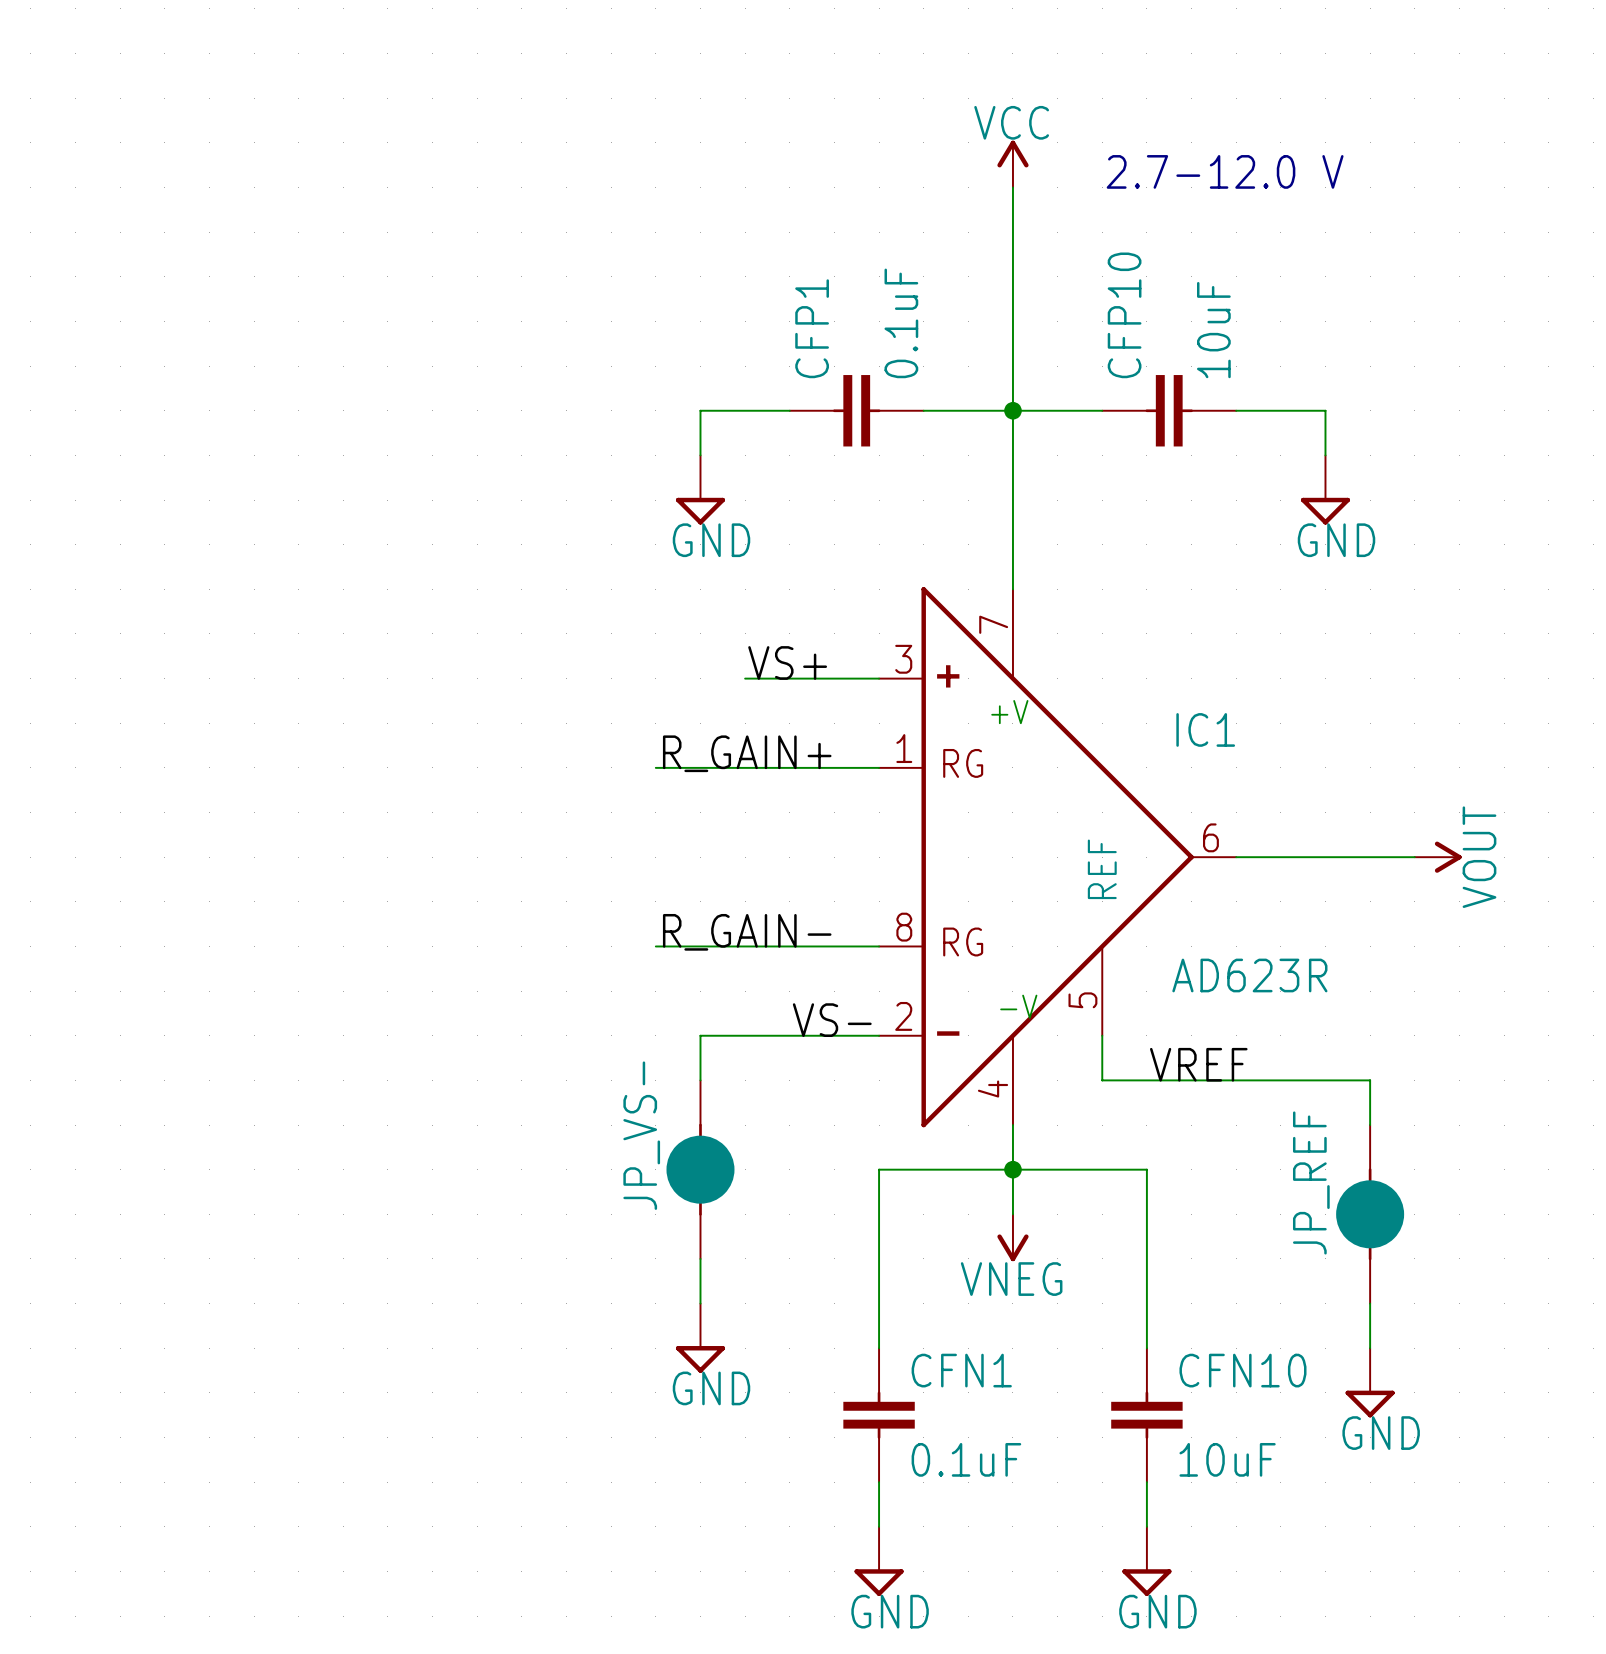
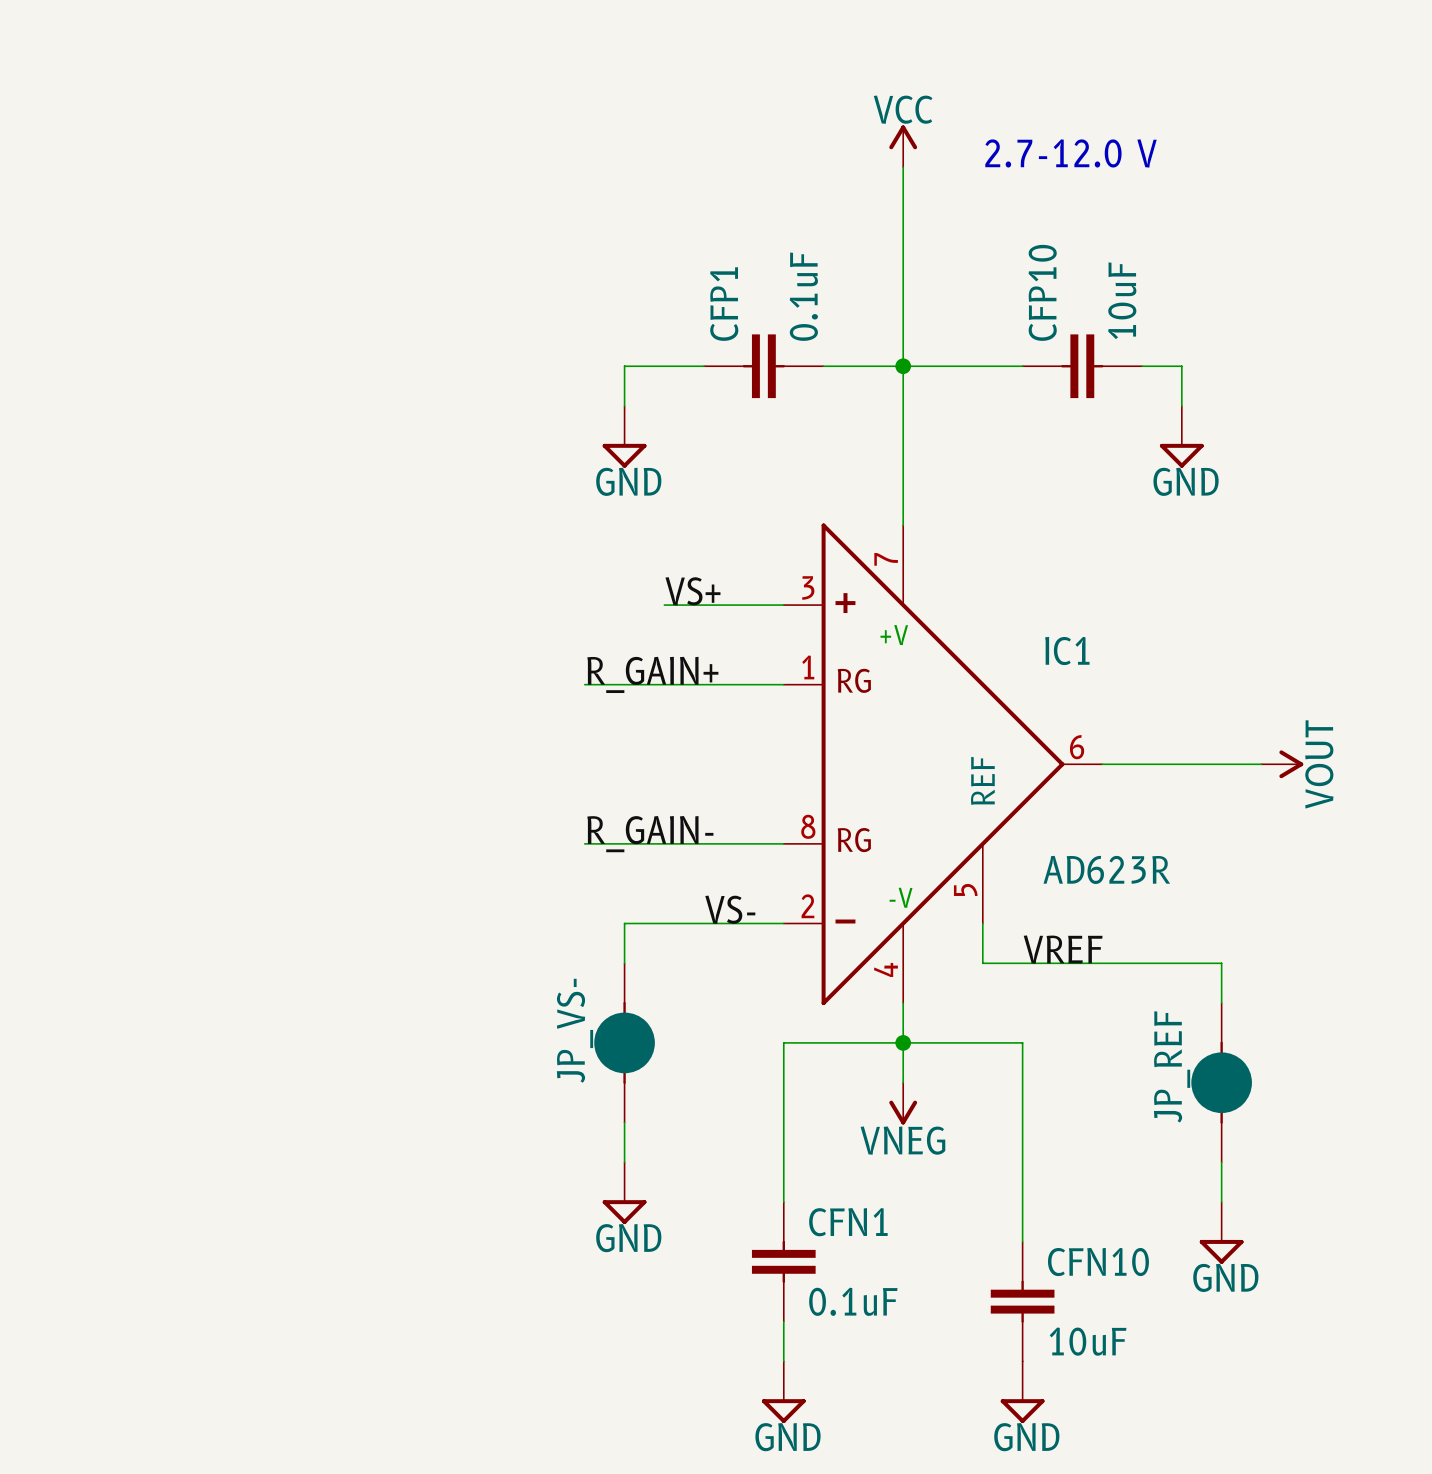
CFP10 position: (1169, 410) -> (1082, 366)
CFN10 position: (1146, 1415) -> (1022, 1301)

